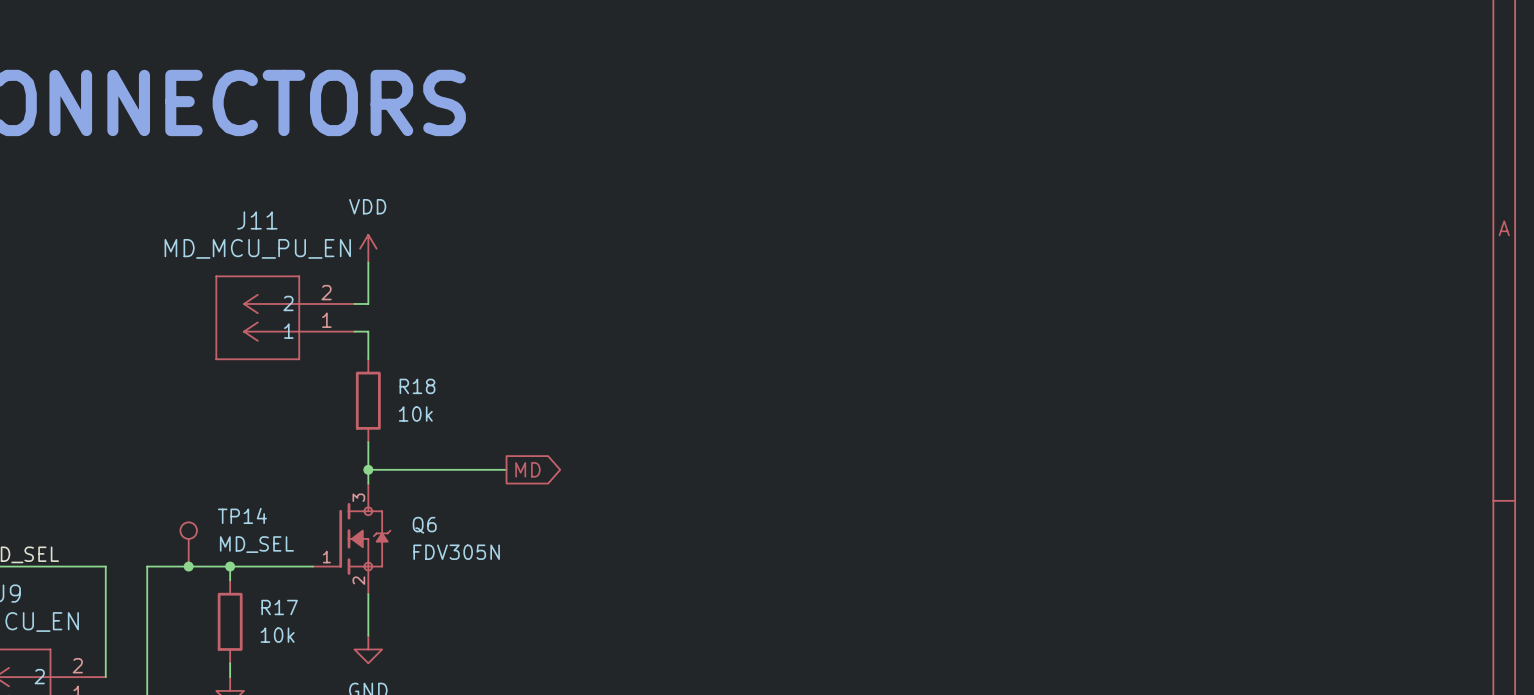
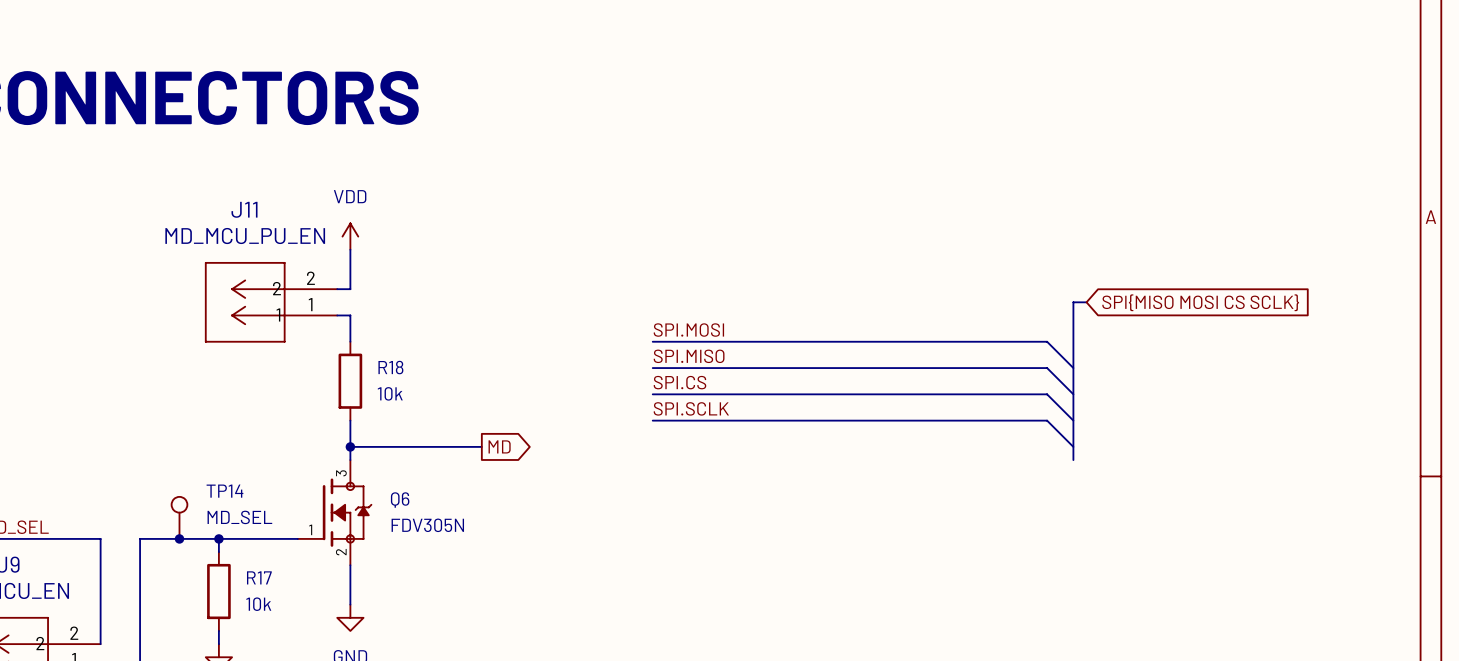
bus: none -> (1086, 302) (1073, 302) (1073, 460)
global label: none -> SPI{MISO MOSI CS SCLK} (1200, 302)
label: none -> SPI.MOSI (688, 330)
wire: none -> (652, 341) (1047, 341) (1073, 368)
label: none -> SPI.MISO (689, 356)
wire: none -> (652, 368) (1047, 368) (1073, 394)
label: none -> SPI.CS (679, 382)
wire: none -> (652, 394) (1047, 394) (1073, 420)
label: none -> SPI.SCLK (691, 408)
wire: none -> (652, 420) (1047, 420) (1073, 446)

